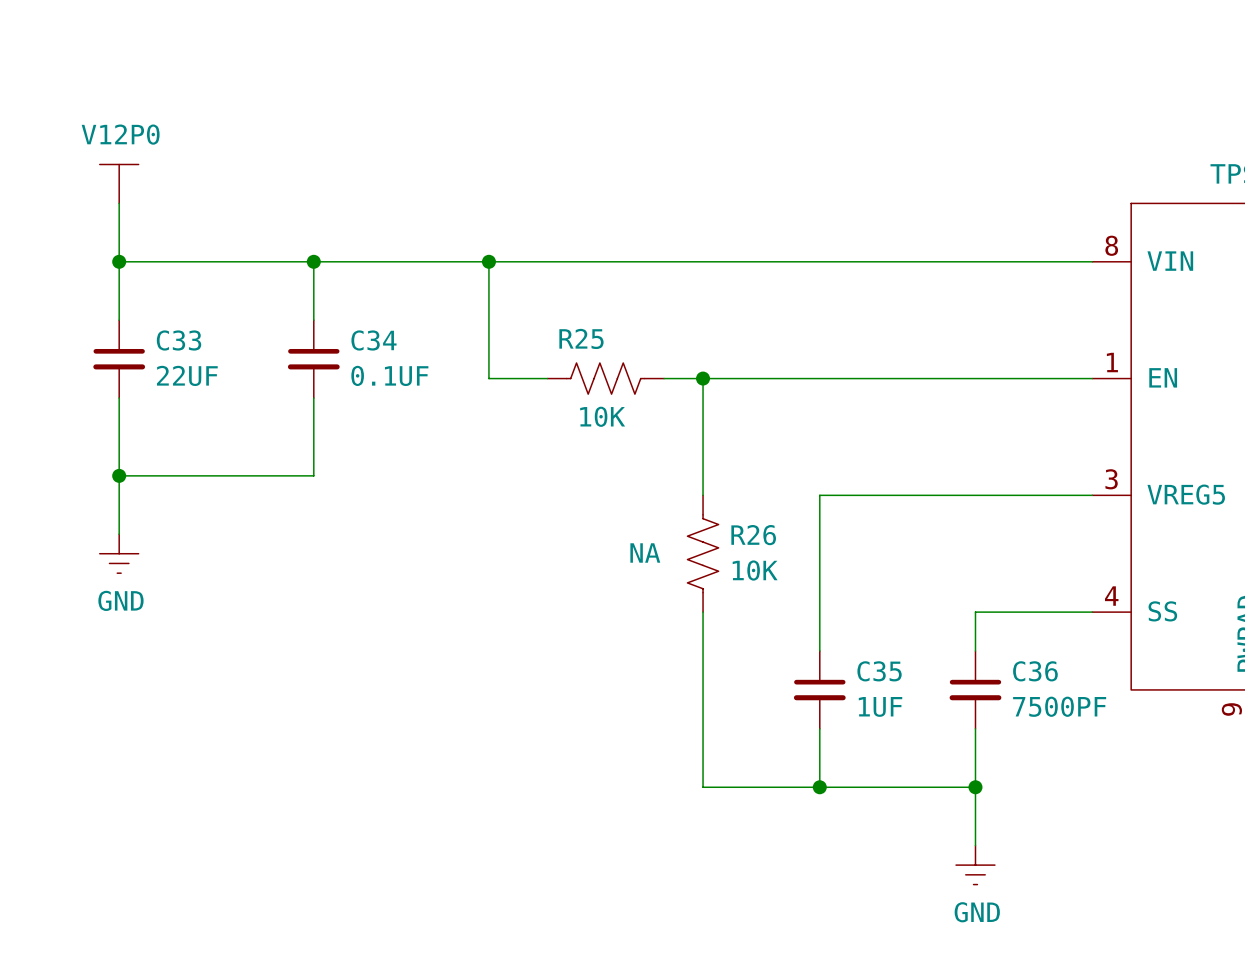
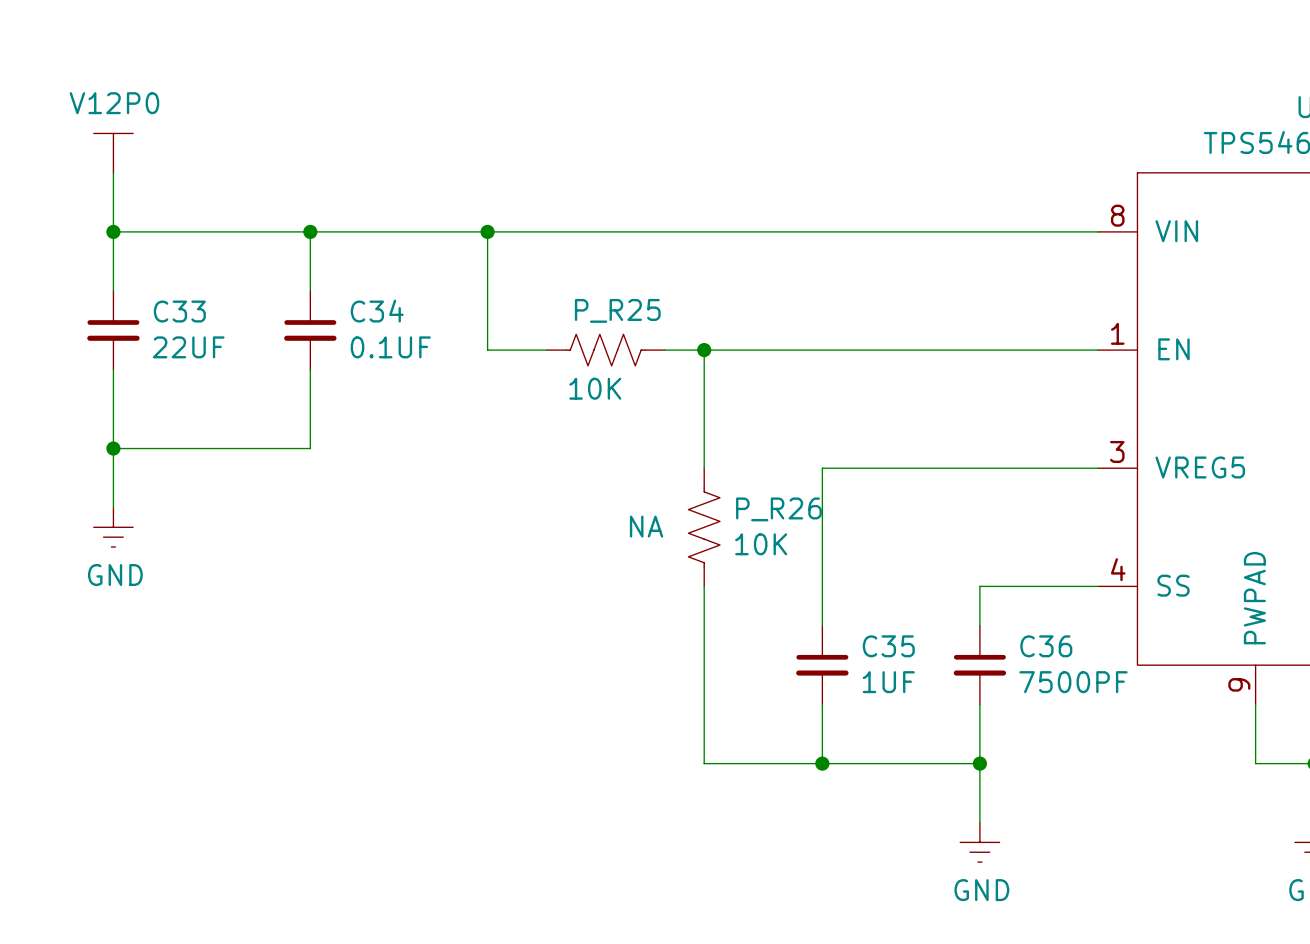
R25 name: R25 (581, 338) -> P_R25 (617, 310)
R26 name: R26 (753, 535) -> P_R26 (778, 509)

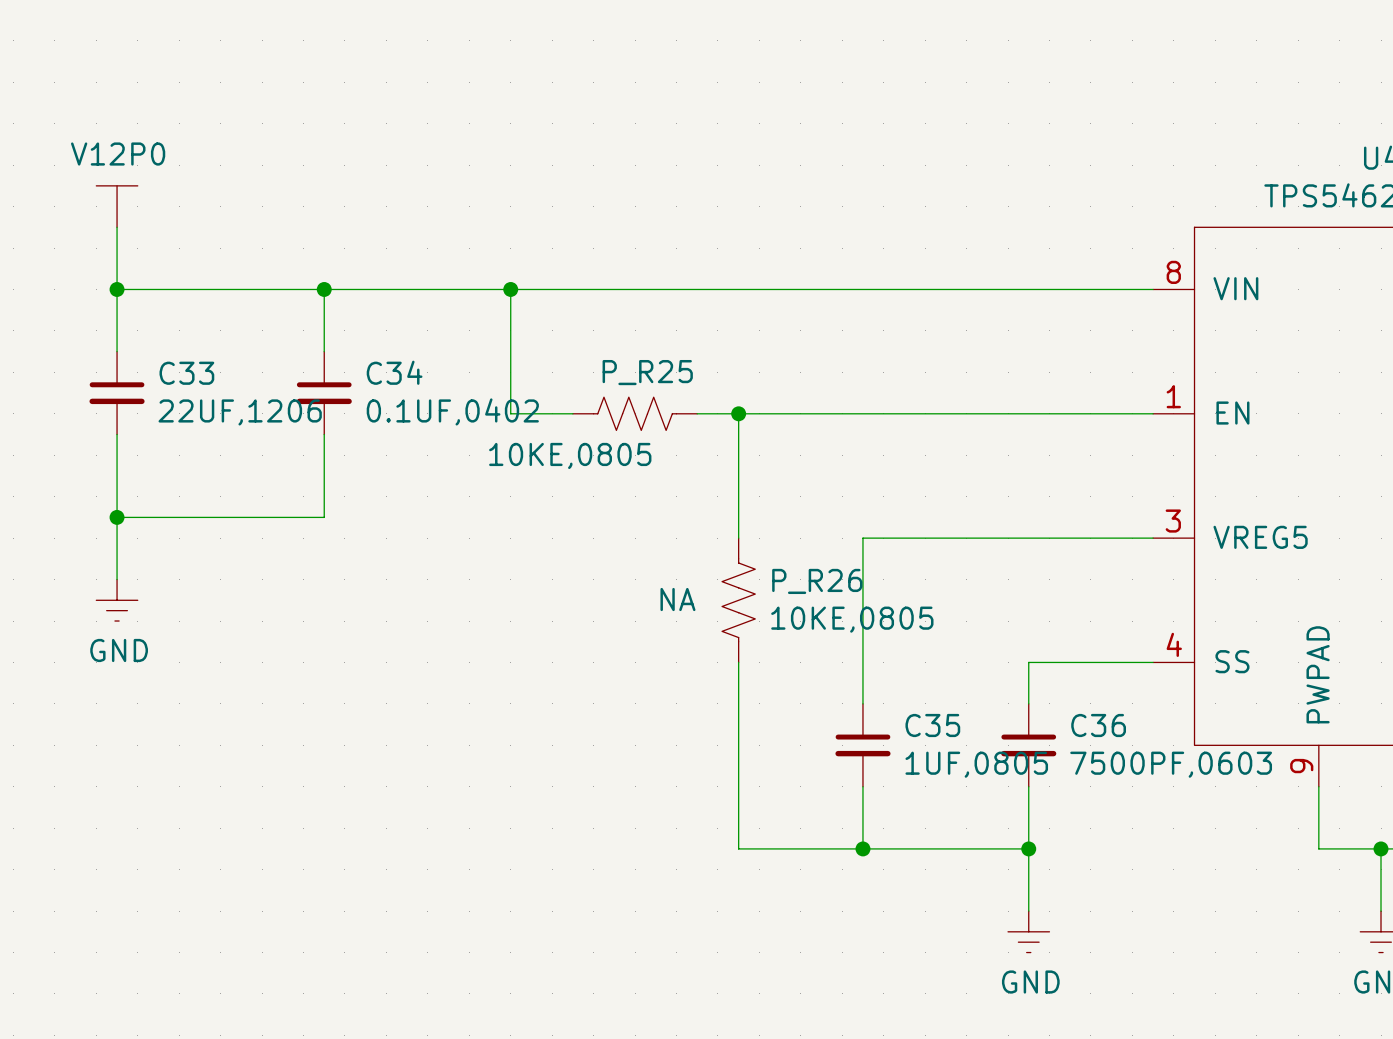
C33 value: 22UF (188, 347) -> 22UF,1206 (240, 412)
C34 value: 0.1UF (390, 347) -> 0.1UF,0402 (452, 411)
P_R25 value: 10K (595, 388) -> 10KE,0805 (570, 455)
P_R26 value: 10K (761, 544) -> 10KE,0805 (852, 619)
C35 value: 1UF (888, 682) -> 1UF,0805 (976, 764)
C36 value: 7500PF (1073, 682) -> 7500PF,0603 (1171, 764)

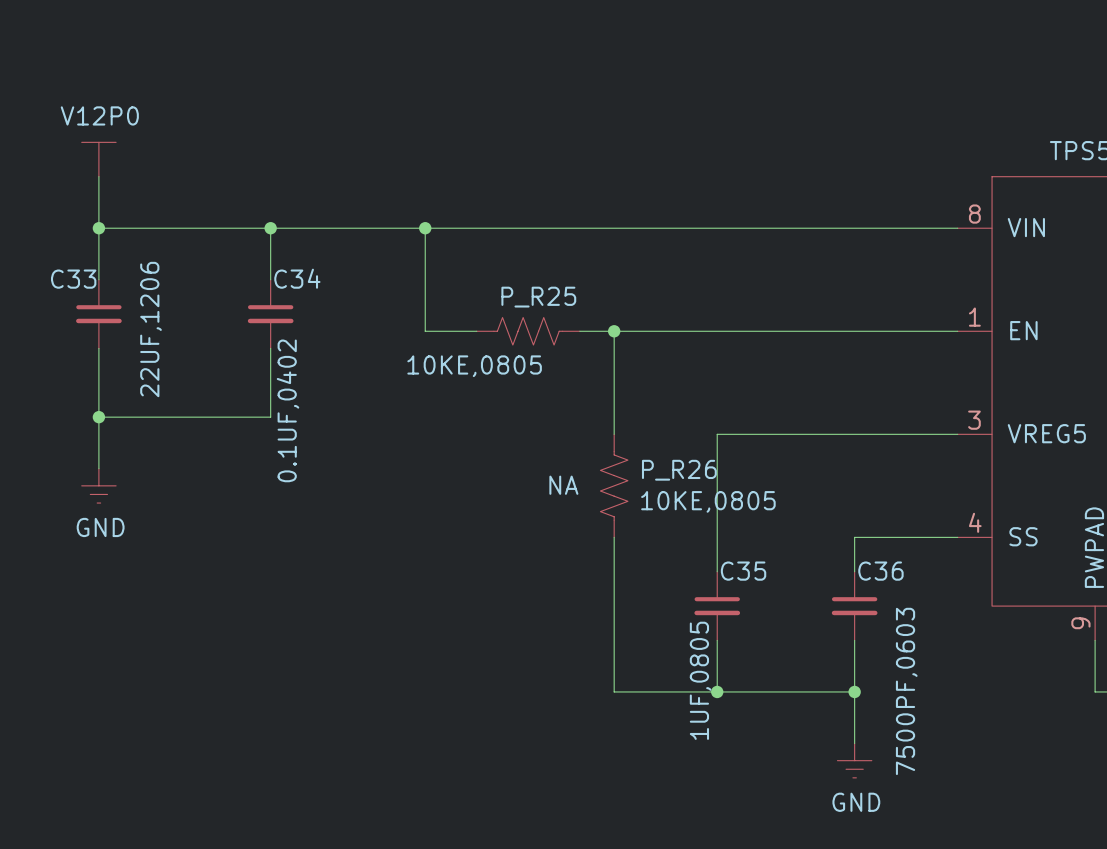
C34 name position: C34 (394, 372) -> C34 (297, 278)
C33 name position: C33 (186, 373) -> C33 (73, 279)
C34 value rotation: 0° (452, 411) -> 90° counterclockwise (288, 410)
C33 value rotation: 0° (240, 412) -> 90° counterclockwise (151, 329)
C35 name position: C35 (932, 725) -> C35 (743, 571)
C36 name position: C36 (1098, 725) -> C36 (880, 571)
C35 value rotation: 0° (976, 764) -> 90° counterclockwise (700, 680)
C36 value rotation: 0° (1171, 764) -> 90° counterclockwise (906, 691)

